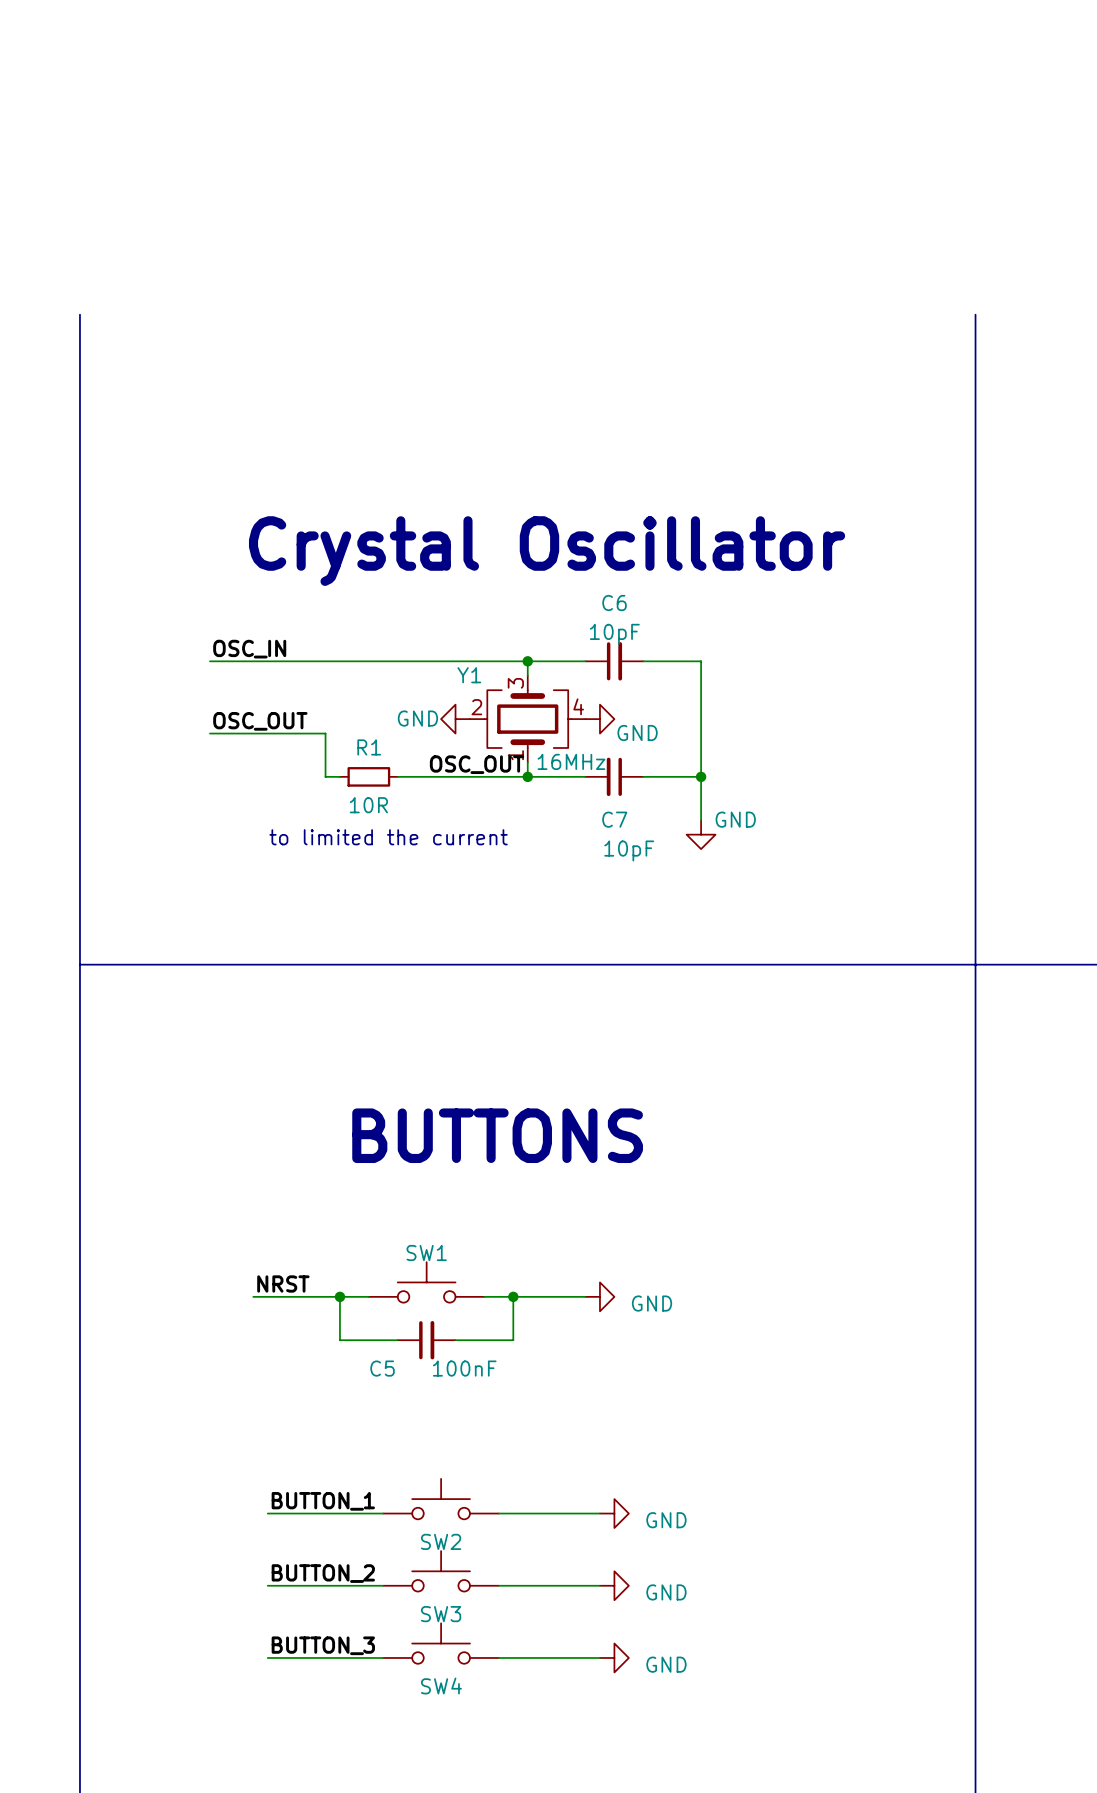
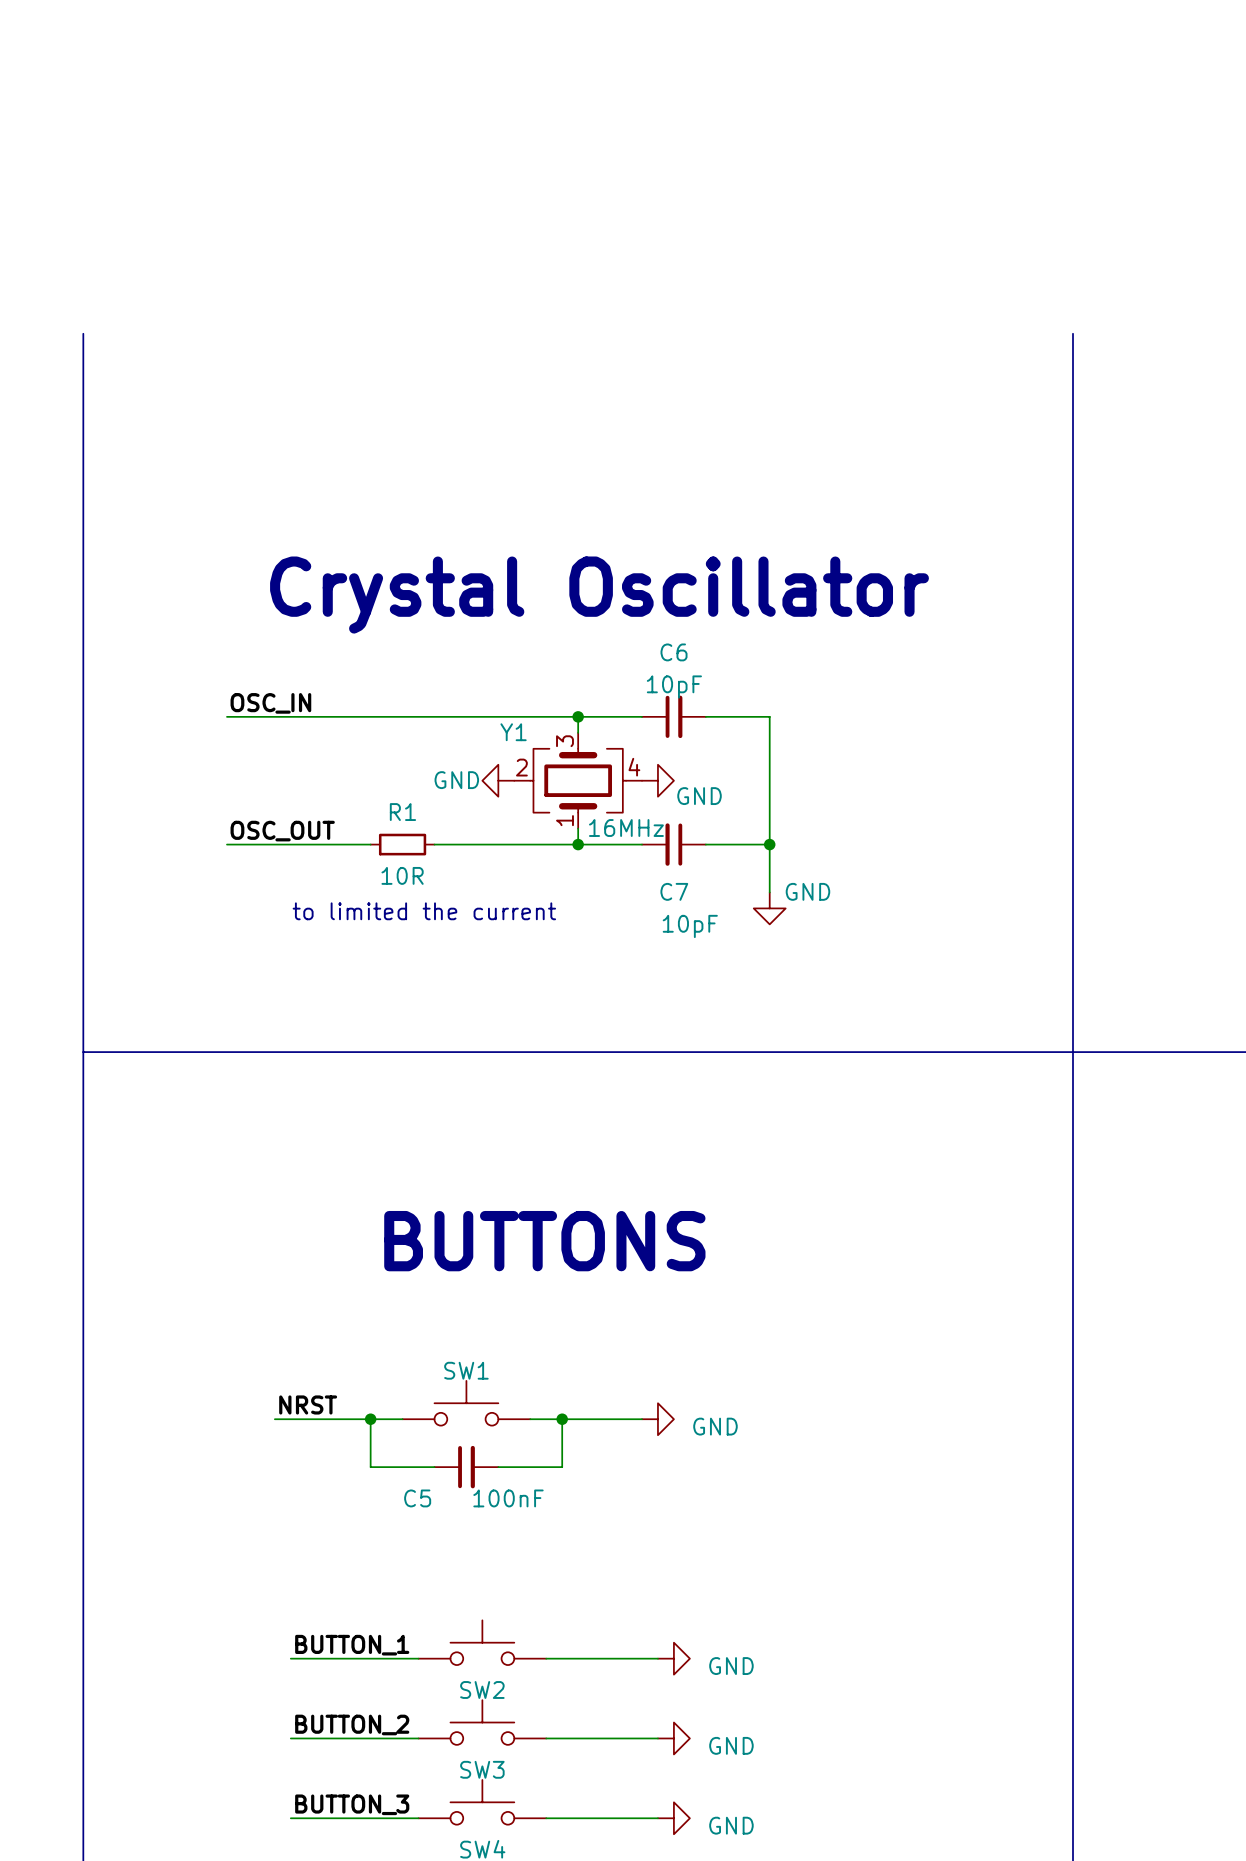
label position: OSC_OUT (260, 721) -> OSC_OUT (282, 831)
wire: (209, 733) (325, 733) (325, 776) -> (226, 844) (354, 844)
label: OSC_OUT (477, 764) -> none

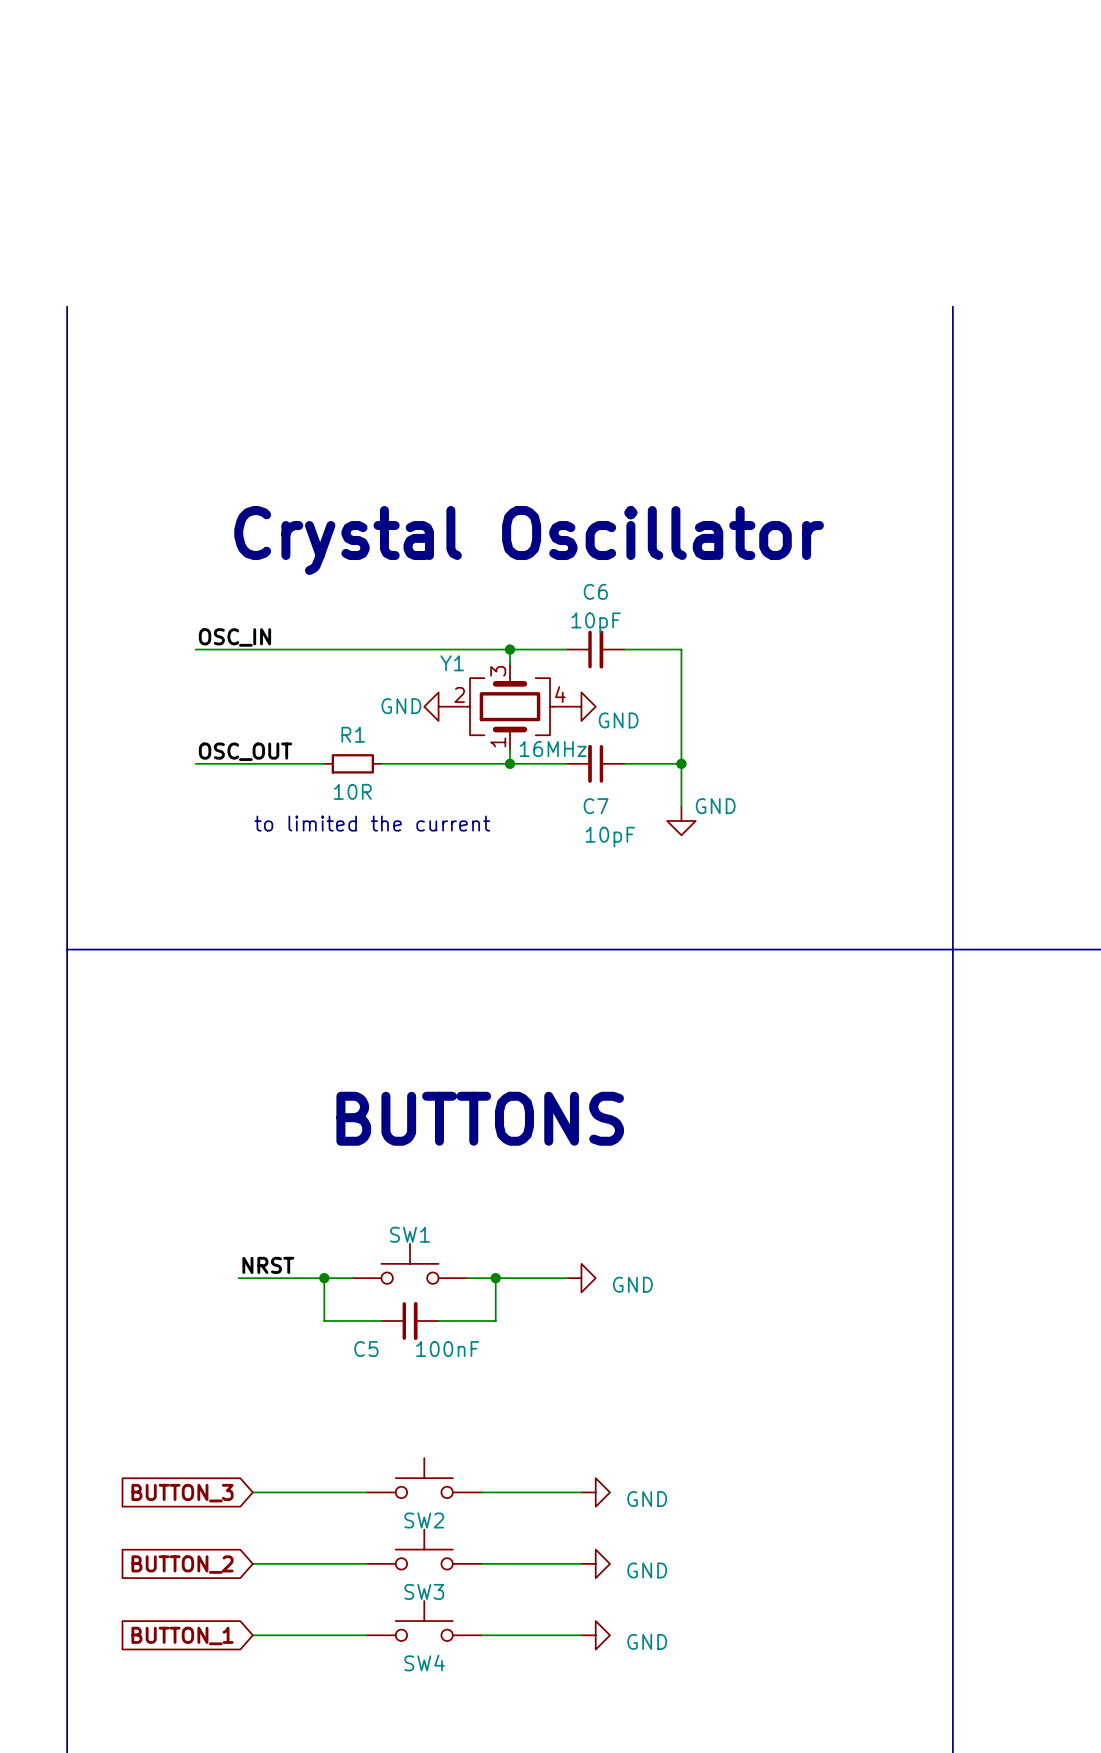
label: BUTTON_1 (352, 1645) -> none
global label: none -> BUTTON_3 (182, 1493)
label: BUTTON_2 (352, 1724) -> none
global label: none -> BUTTON_2 (182, 1564)
label: BUTTON_3 (352, 1804) -> none
global label: none -> BUTTON_1 (182, 1635)

